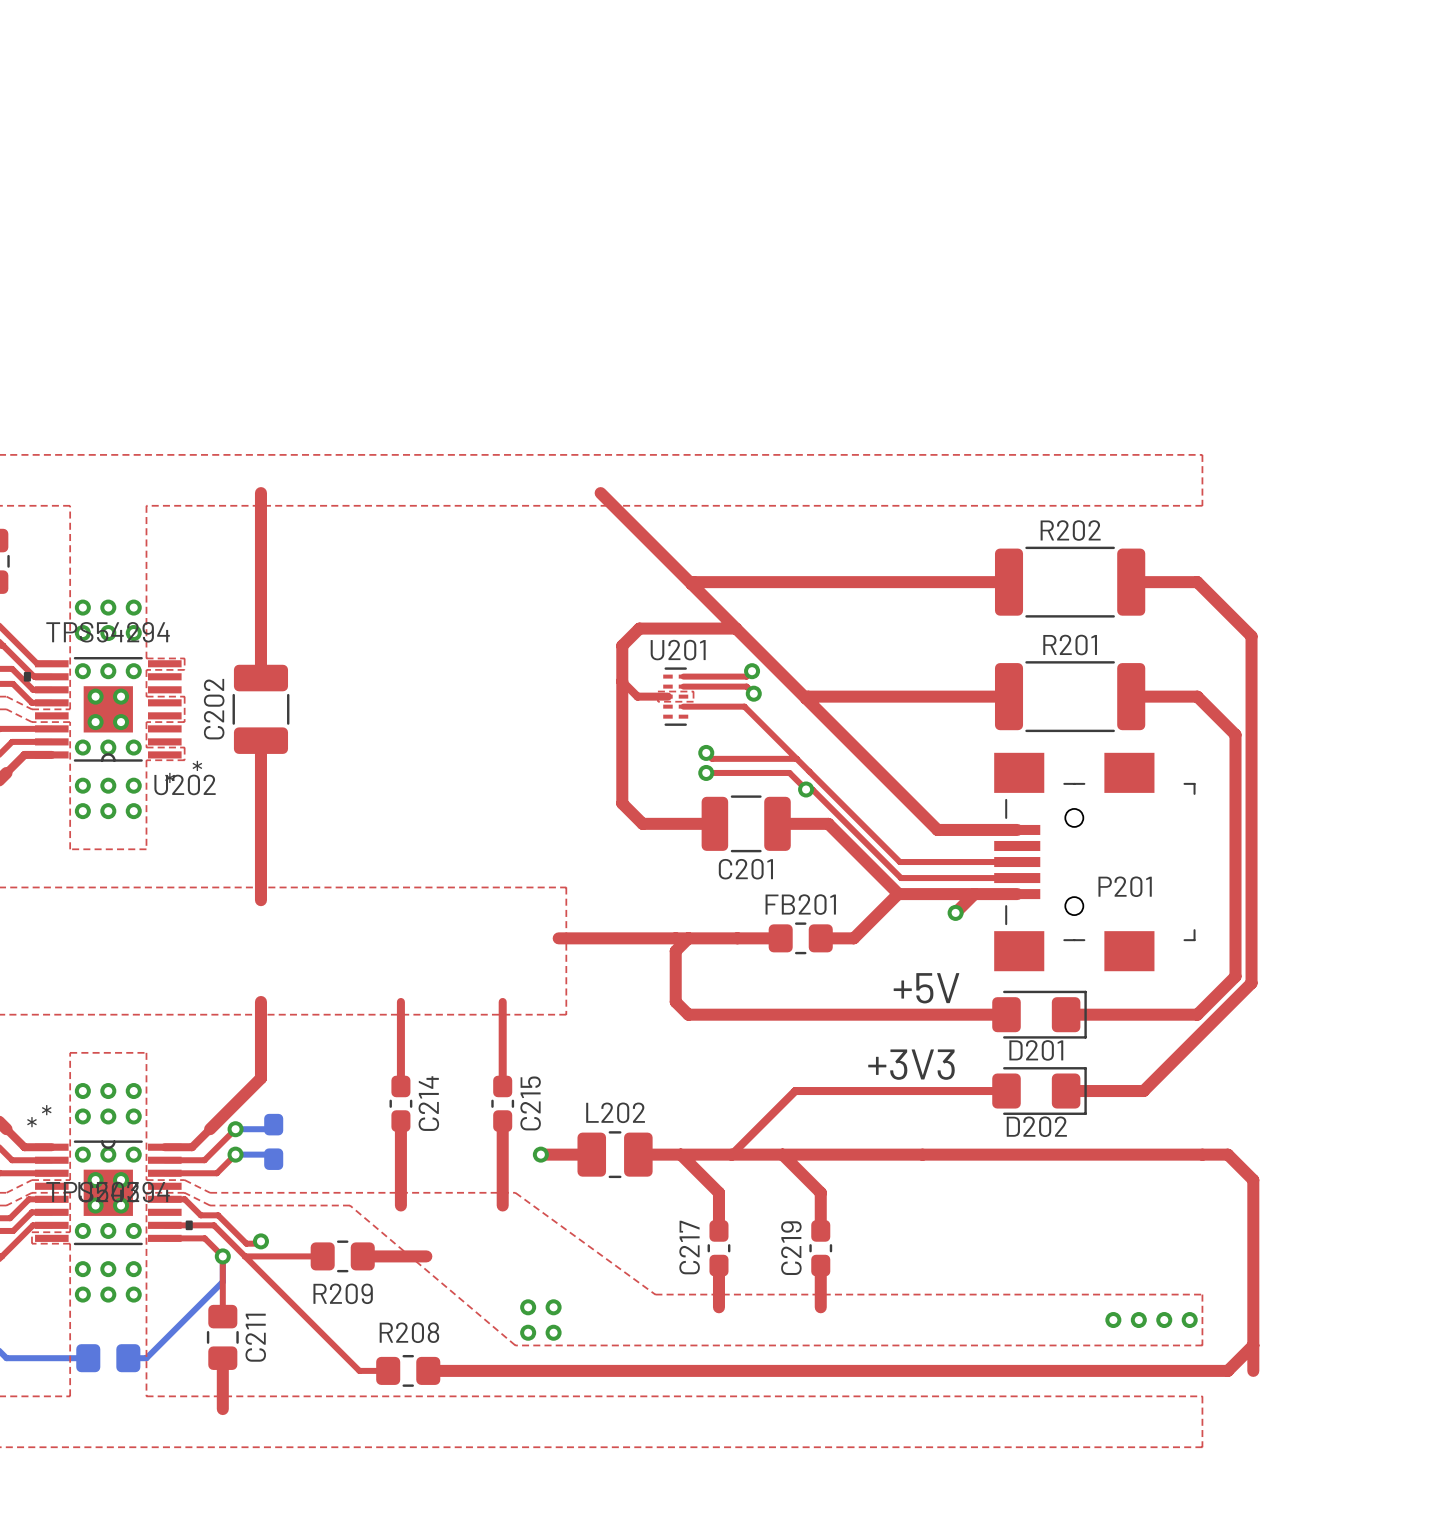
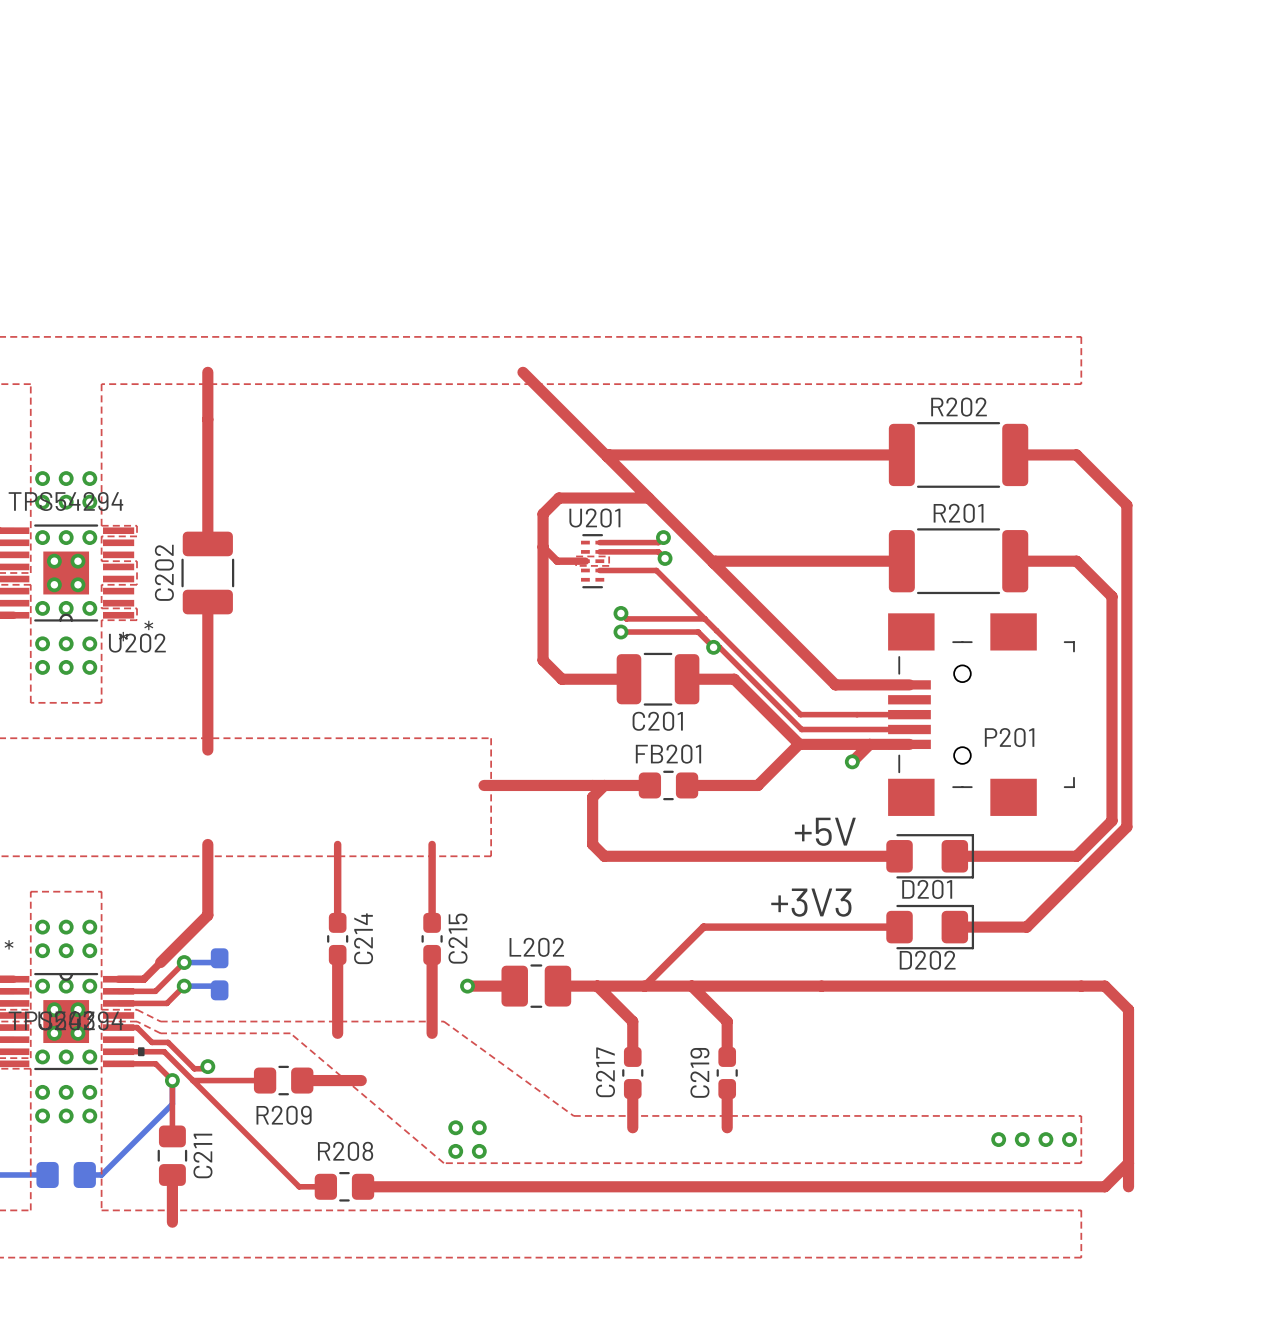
top track: (737, 938) (777, 938) -> (690, 785) (727, 785)
FB201 position: (800, 938) -> (668, 785)

